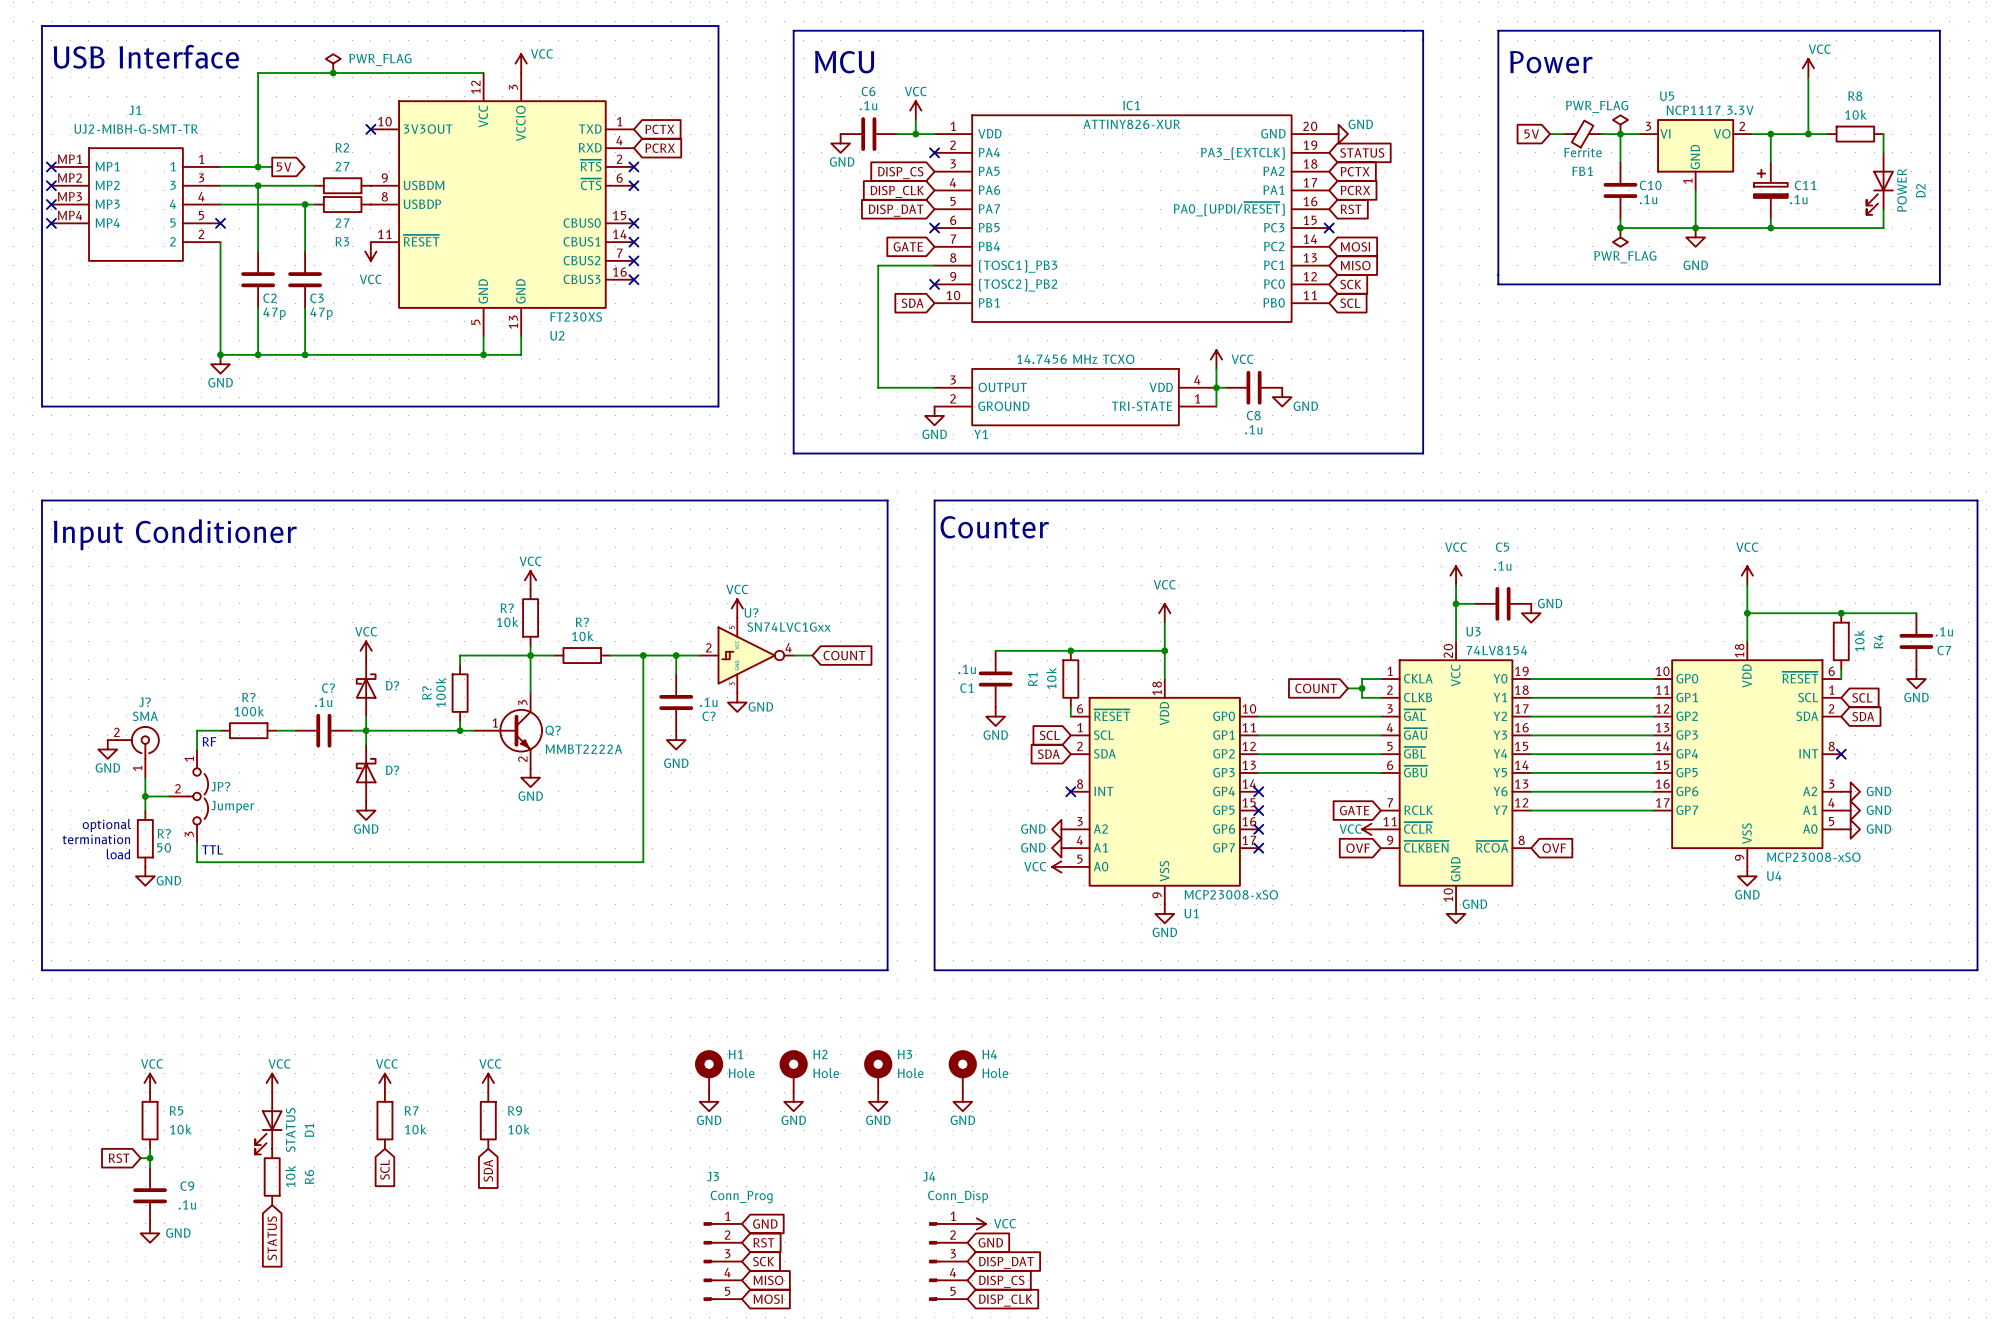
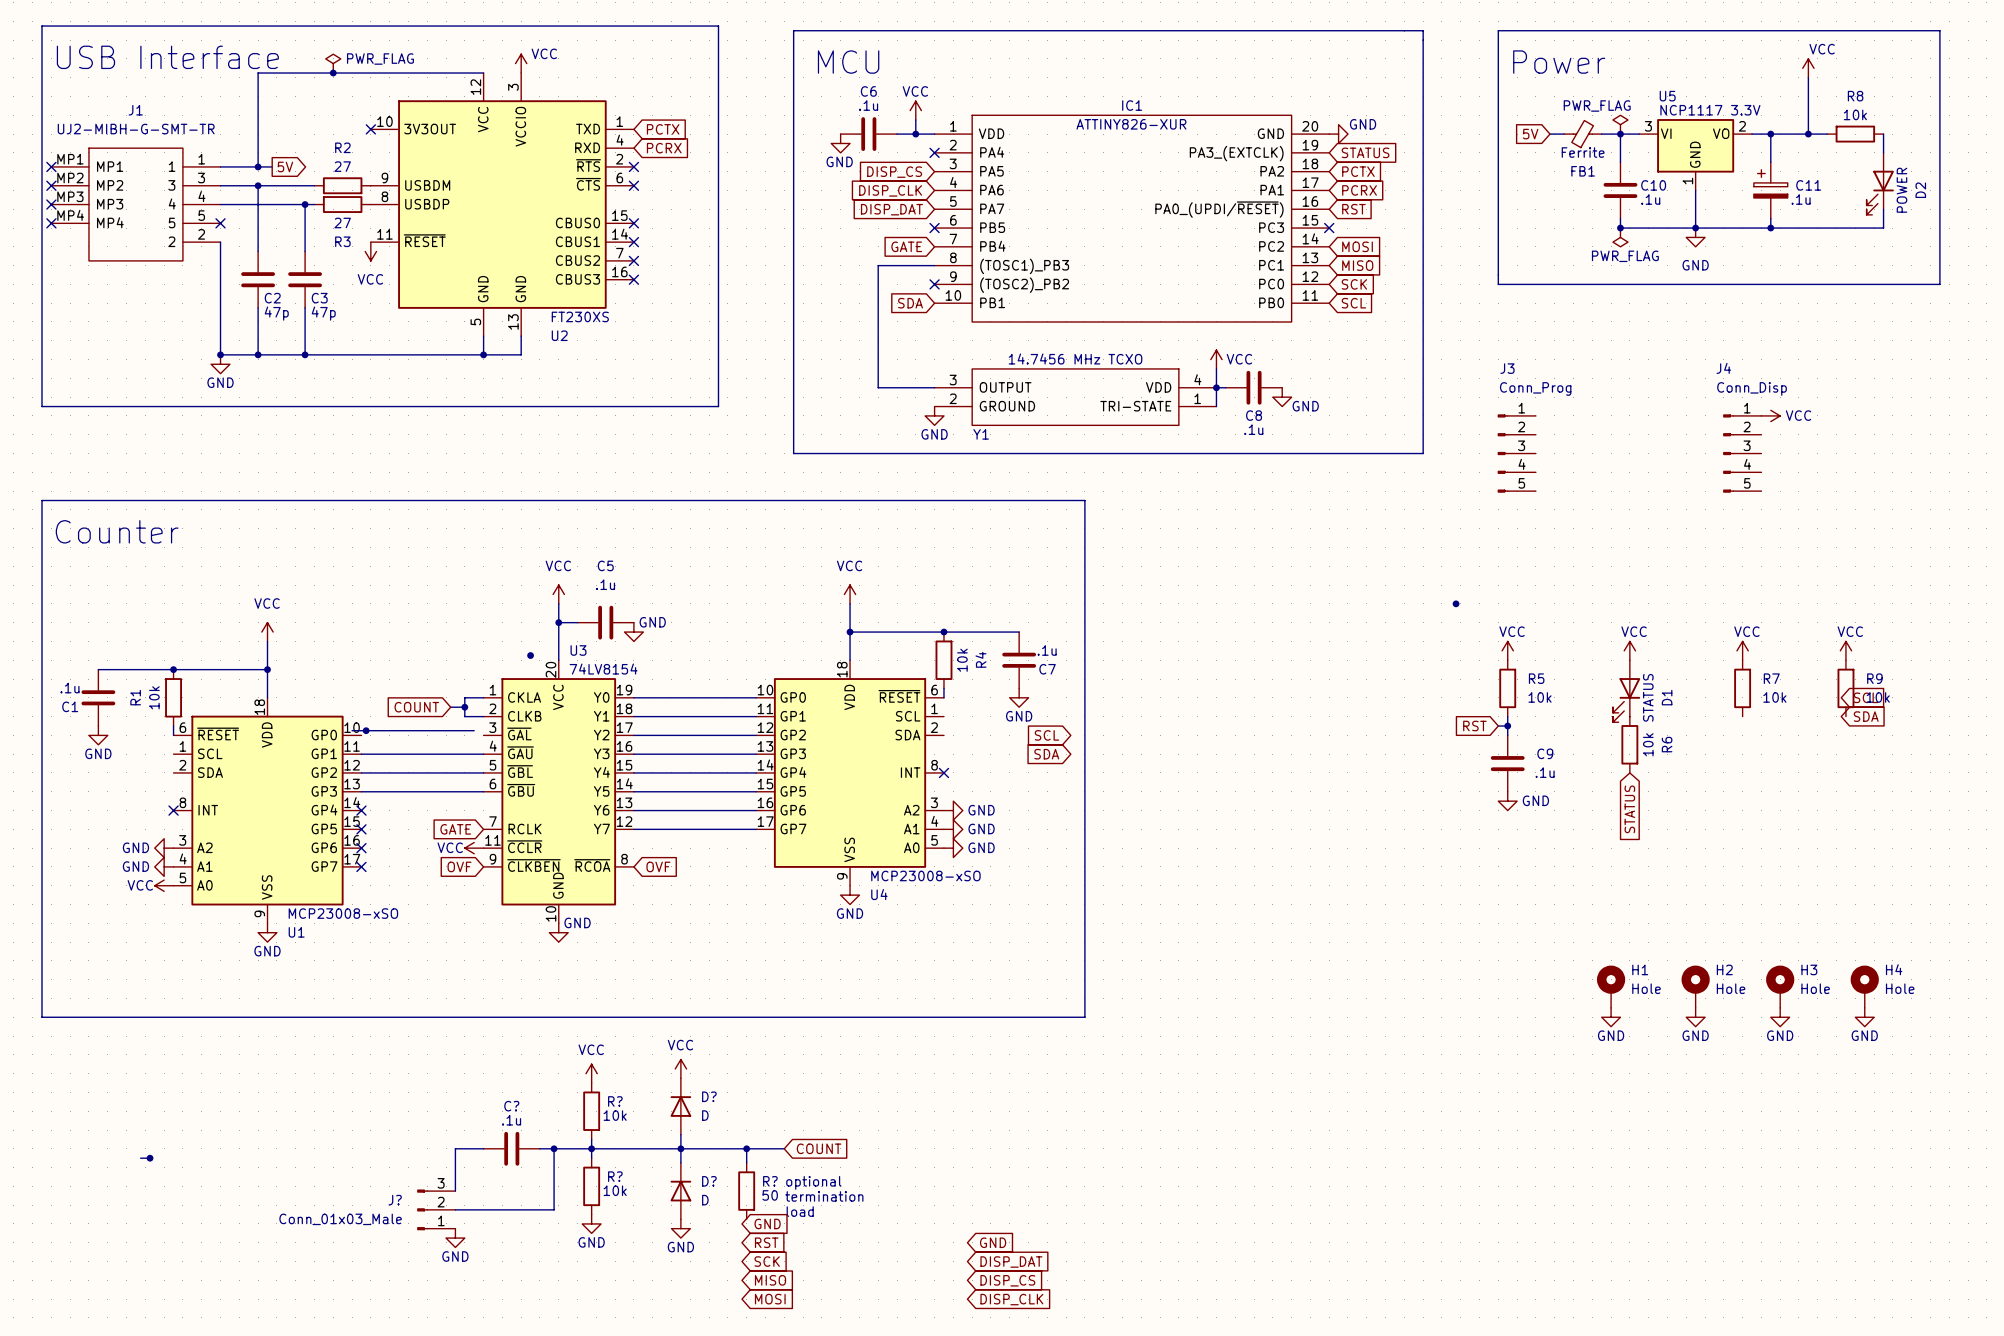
power symbol: none -> VCC (1770, 415)
line: (887, 500) (887, 970) (42, 970) -> (1084, 500) (1084, 1017) (42, 1017) (42, 970)
line: (934, 500) (934, 970) (1977, 970) (1977, 500) (1084, 500) -> (934, 500) (887, 500)
text: Counter (994, 527) -> none
text: Input Conditioner (175, 534) -> Counter (117, 531)
power symbol text position: VCC (1456, 547) -> VCC (1512, 631)
power symbol text position: VCC (530, 561) -> VCC (558, 565)
power symbol position: VCC (1456, 575) -> VCC (1507, 650)
power symbol: VCC (1747, 575) -> none
power symbol position: VCC (530, 580) -> VCC (558, 594)
wire: (1456, 585) (1456, 641) -> none
wire: (1747, 585) (1747, 641) -> none
power symbol: none -> VCC (850, 594)
wire: none -> (558, 603) (558, 660)
wire: none -> (850, 603) (850, 660)
wire: (1456, 603) (1474, 603) -> none
C5 position: (1503, 603) -> (605, 622)
power symbol: VCC (737, 608) -> none
power symbol: VCC (1164, 613) -> none
power symbol: GND (1531, 613) -> none
wire: (1747, 613) (1916, 613) -> none
junction: (1747, 613) -> none
junction: (1841, 613) -> none
R?: 10k (530, 617) -> none
wire: none -> (558, 622) (577, 622)
junction: none -> (558, 622)
wire: (1164, 622) (1164, 679) -> none
power symbol: none -> VCC (267, 632)
power symbol: none -> GND (633, 632)
junction: none -> (850, 632)
junction: none -> (943, 632)
wire: none -> (267, 641) (267, 697)
R4 position: (1841, 641) -> (943, 660)
C7 position: (1916, 641) -> (1019, 660)
wire: (530, 646) (530, 693) -> none
power symbol: VCC (366, 650) -> none
wire: (995, 650) (1164, 650) -> (850, 632) (1019, 632)
junction: (1070, 650) -> none
junction: (1164, 650) -> none
power symbol: none -> VCC (1629, 650)
power symbol: none -> VCC (1742, 650)
power symbol: none -> VCC (1845, 650)
wire: (554, 655) (460, 655) (460, 664) -> none
R?: 10k (582, 655) -> none
wire: (610, 655) (699, 655) -> none
wire: (643, 655) (643, 862) (197, 862) (197, 843) -> none
junction: (643, 655) -> none
wire: (676, 655) (676, 674) -> none
junction: (676, 655) -> none
U?: SN74LVC1Gxx (746, 655) -> none
wire: (793, 655) (812, 655) -> none
global label: COUNT (844, 655) -> none
wire: none -> (98, 669) (267, 669)
junction: none -> (173, 669)
junction: none -> (267, 669)
wire: (1841, 669) (1841, 679) -> none
C1 position: (995, 679) -> (98, 697)
R1 position: (1070, 679) -> (173, 697)
wire: (1380, 679) (1362, 679) (1362, 697) (1380, 697) -> none
wire: (1531, 679) (1653, 679) -> none
power symbol: GND (1916, 679) -> none
D?: (366, 688) -> none
global label: COUNT (1316, 688) -> none
wire: (1347, 688) (1362, 688) -> none
junction: (1362, 688) -> none
R?: 100k (460, 693) -> none
wire: none -> (483, 697) (464, 697) (464, 716) (483, 716)
wire: none -> (633, 697) (756, 697)
wire: (1531, 697) (1653, 697) -> none
C?: .1u (676, 702) -> none
power symbol: GND (737, 702) -> none
global label: none -> COUNT (416, 707)
wire: none -> (450, 707) (464, 707)
wire: (1070, 707) (1070, 716) -> (943, 688) (943, 697)
wire: (366, 716) (366, 744) -> none
wire: none -> (633, 716) (756, 716)
power symbol position: GND (995, 716) -> GND (1019, 697)
wire: (1258, 716) (1380, 716) -> none
wire: (1531, 716) (1653, 716) -> none
wire: (460, 721) (460, 730) -> none
wire: none -> (173, 726) (173, 735)
global label: none -> RST (1474, 726)
junction: none -> (1507, 726)
R?: 100k (248, 730) -> none
C?: .1u (323, 730) -> none
junction position: (460, 730) -> (464, 707)
Q?: MMBT2222A (508, 730) -> none
wire: none -> (633, 735) (756, 735)
wire: (1258, 735) (1380, 735) -> none
wire: (1531, 735) (1653, 735) -> none
power symbol: GND (676, 740) -> none
text: RF (209, 741) -> none
power symbol position: GND (107, 749) -> GND (98, 735)
J?: SMA (133, 751) -> none
wire: none -> (361, 754) (483, 754)
wire: none -> (633, 754) (756, 754)
wire: (1258, 754) (1380, 754) -> none
wire: (1531, 754) (1653, 754) -> none
U4 position: (1747, 754) -> (850, 772)
no-connect mark: (1841, 754) -> none
wire: none -> (361, 772) (483, 772)
D?: (366, 772) -> none
wire: none -> (633, 772) (756, 772)
no-connect mark: none -> (943, 772)
wire: (1258, 772) (1380, 772) -> none
U3 position: (1456, 772) -> (558, 791)
wire: (1531, 772) (1653, 772) -> none
wire: (145, 777) (145, 810) -> none
power symbol: GND (530, 777) -> none
wire: none -> (361, 791) (483, 791)
wire: none -> (633, 791) (756, 791)
no-connect mark: (1070, 791) -> none
U1 position: (1164, 791) -> (267, 810)
no-connect mark: (1258, 791) -> none
wire: (1531, 791) (1653, 791) -> none
power symbol: GND (1850, 791) -> none
wire: (145, 796) (168, 796) -> none
junction: (145, 796) -> none
JP?: Jumper (188, 796) -> none
power symbol: none -> GND (1507, 801)
global label: none -> STATUS (1629, 809)
no-connect mark: none -> (173, 810)
no-connect mark: none -> (361, 810)
power symbol: GND (366, 810) -> none
wire: none -> (633, 810) (756, 810)
power symbol: none -> GND (953, 810)
no-connect mark: (1258, 810) -> none
global label: GATE (1354, 810) -> none
wire: (1531, 810) (1653, 810) -> none
power symbol: GND (1850, 810) -> none
text: optional (106, 825) -> none
no-connect mark: none -> (361, 829)
global label: none -> GATE (455, 829)
wire: none -> (633, 829) (756, 829)
power symbol: none -> GND (953, 829)
power symbol: GND (1061, 829) -> none
no-connect mark: (1258, 829) -> none
power symbol: VCC (1371, 829) -> none
power symbol: GND (1850, 829) -> none
R?: 50 (145, 838) -> none
text: termination (96, 839) -> none
power symbol: none -> GND (164, 848)
no-connect mark: none -> (361, 848)
power symbol: none -> VCC (474, 848)
power symbol: none -> GND (953, 848)
power symbol: GND (1061, 848) -> none
no-connect mark: (1258, 848) -> none
global label: OVF (1358, 848) -> none
global label: OVF (1554, 848) -> none
text: TTL (212, 849) -> none
text: load (118, 854) -> none
power symbol: none -> GND (164, 866)
no-connect mark: none -> (361, 866)
power symbol: VCC (1061, 866) -> none
global label: none -> OVF (459, 866)
global label: none -> OVF (658, 866)
power symbol: GND (145, 876) -> none
power symbol: GND (1747, 876) -> none
power symbol: none -> VCC (164, 885)
power symbol: none -> GND (850, 895)
power symbol: GND (1164, 913) -> none
power symbol: GND (1456, 913) -> none
power symbol: none -> GND (267, 932)
power symbol: none -> GND (558, 932)
power symbol: none -> GND (1611, 1017)
power symbol: none -> GND (1695, 1017)
power symbol: none -> GND (1780, 1017)
power symbol: none -> GND (1864, 1017)
power symbol: none -> VCC (680, 1068)
H1 position: (709, 1071) -> (1611, 986)
H2 position: (793, 1071) -> (1695, 986)
H3 position: (878, 1071) -> (1780, 986)
H4 position: (962, 1071) -> (1864, 986)
power symbol: none -> VCC (591, 1073)
power symbol: VCC (150, 1083) -> none
power symbol: VCC (272, 1083) -> none
power symbol: VCC (384, 1083) -> none
power symbol: VCC (488, 1083) -> none
power symbol: GND (709, 1101) -> none
power symbol: GND (793, 1101) -> none
power symbol: GND (878, 1101) -> none
power symbol: GND (962, 1101) -> none
D?: none -> D (680, 1106)
R?: none -> 10k (591, 1111)
R5 position: (150, 1120) -> (1507, 688)
R7 position: (384, 1120) -> (1742, 688)
R9 position: (488, 1120) -> (1845, 688)
D1 position: (268, 1123) -> (1626, 691)
wire: none -> (680, 1134) (680, 1162)
wire: none -> (591, 1139) (591, 1158)
wire: (150, 1148) (150, 1167) -> none
wire: none -> (483, 1148) (455, 1148) (455, 1191)
C?: none -> .1u (511, 1148)
wire: none -> (539, 1148) (784, 1148)
wire: none -> (554, 1148) (554, 1209) (455, 1209)
junction: none -> (554, 1148)
junction: none -> (591, 1148)
junction: none -> (680, 1148)
wire: none -> (746, 1148) (746, 1162)
junction: none -> (746, 1148)
global label: none -> COUNT (819, 1148)
global label: RST (119, 1158) -> none
global label: SCL (384, 1169) -> none
global label: SDA (488, 1170) -> none
R6 position: (272, 1176) -> (1629, 744)
text: none -> optional (813, 1182)
R?: none -> 10k (591, 1186)
D?: none -> D (680, 1191)
R?: none -> 50 (746, 1191)
C9 position: (150, 1195) -> (1507, 763)
text: none -> termination (824, 1196)
J?: none -> Conn_01x03_Male (436, 1209)
text: none -> load (800, 1211)
power symbol: none -> GND (591, 1223)
power symbol: VCC (976, 1223) -> none
power symbol: none -> GND (680, 1228)
power symbol: GND (150, 1233) -> none
global label: STATUS (272, 1238) -> none
power symbol: none -> GND (455, 1238)
J3 position: (722, 1261) -> (1516, 453)
J4 position: (948, 1261) -> (1742, 453)

